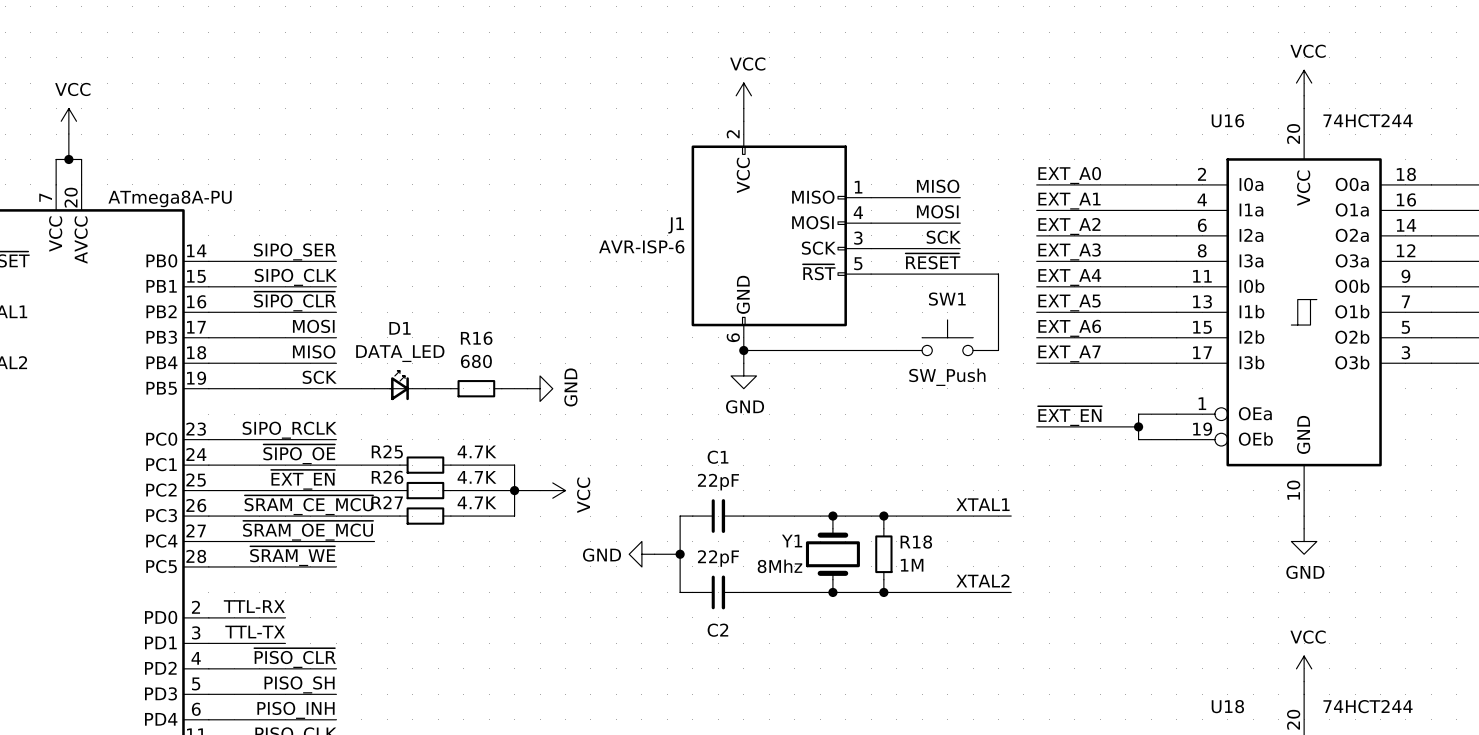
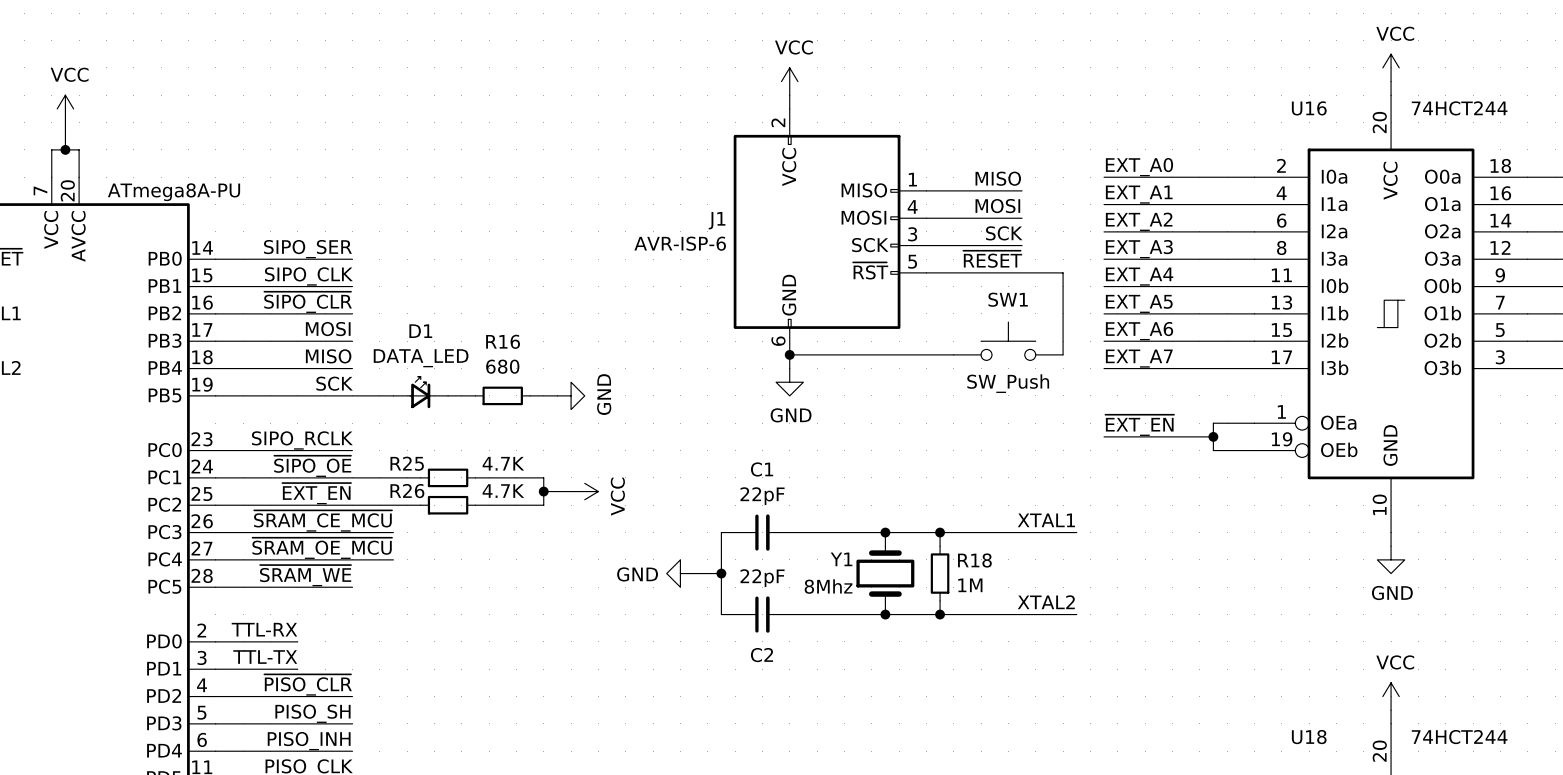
junction position: (514, 490) -> (543, 491)
wire: (540, 490) (514, 490) (514, 516) (450, 516) -> none
power symbol position: VCC (552, 490) -> VCC (584, 491)
wire: (374, 516) (399, 516) -> (543, 491) (571, 491)
R27: 4.7K (425, 516) -> none

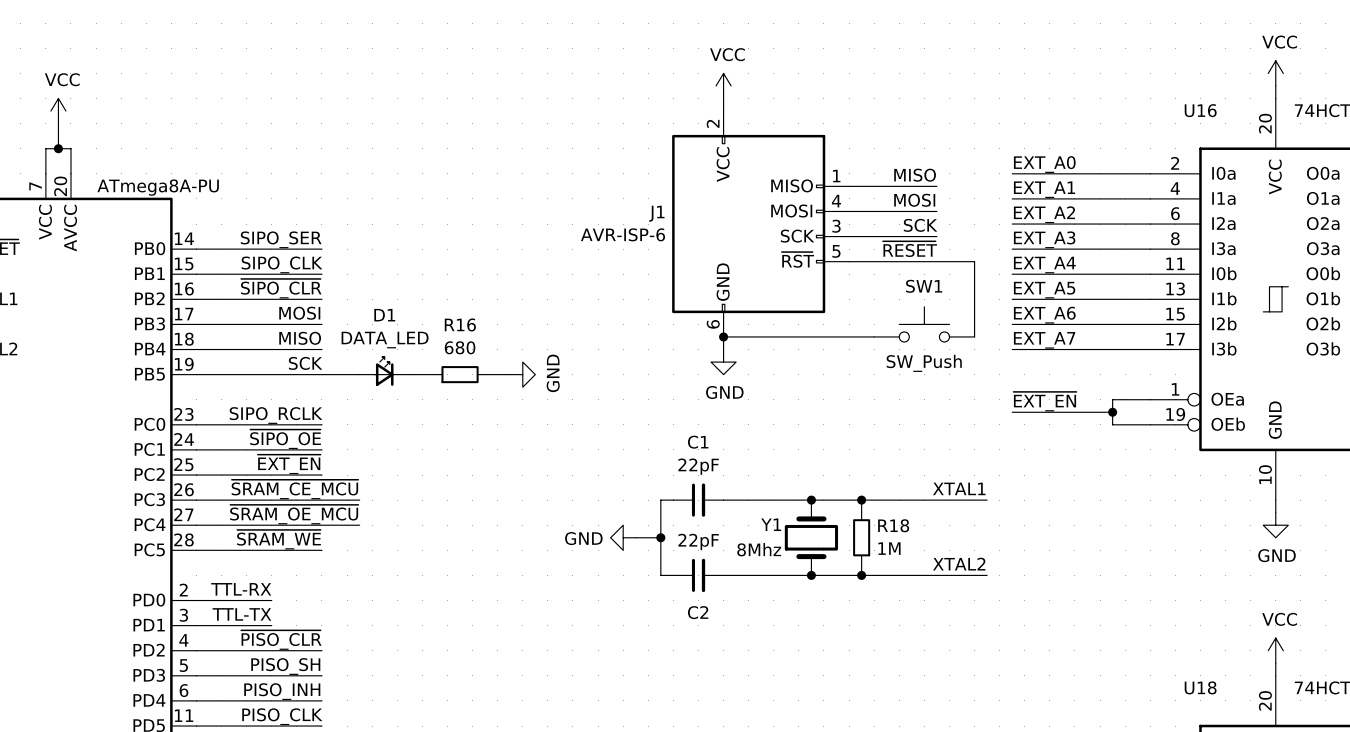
wire: (352, 477) (420, 477) -> none
R25: 4.7K (448, 477) -> none
wire: (475, 477) (543, 477) (543, 505) (475, 505) -> none
wire: (543, 491) (571, 491) -> none
junction: (543, 491) -> none
power symbol: VCC (584, 491) -> none
wire: (352, 505) (420, 505) -> none
R26: 4.7K (448, 505) -> none

